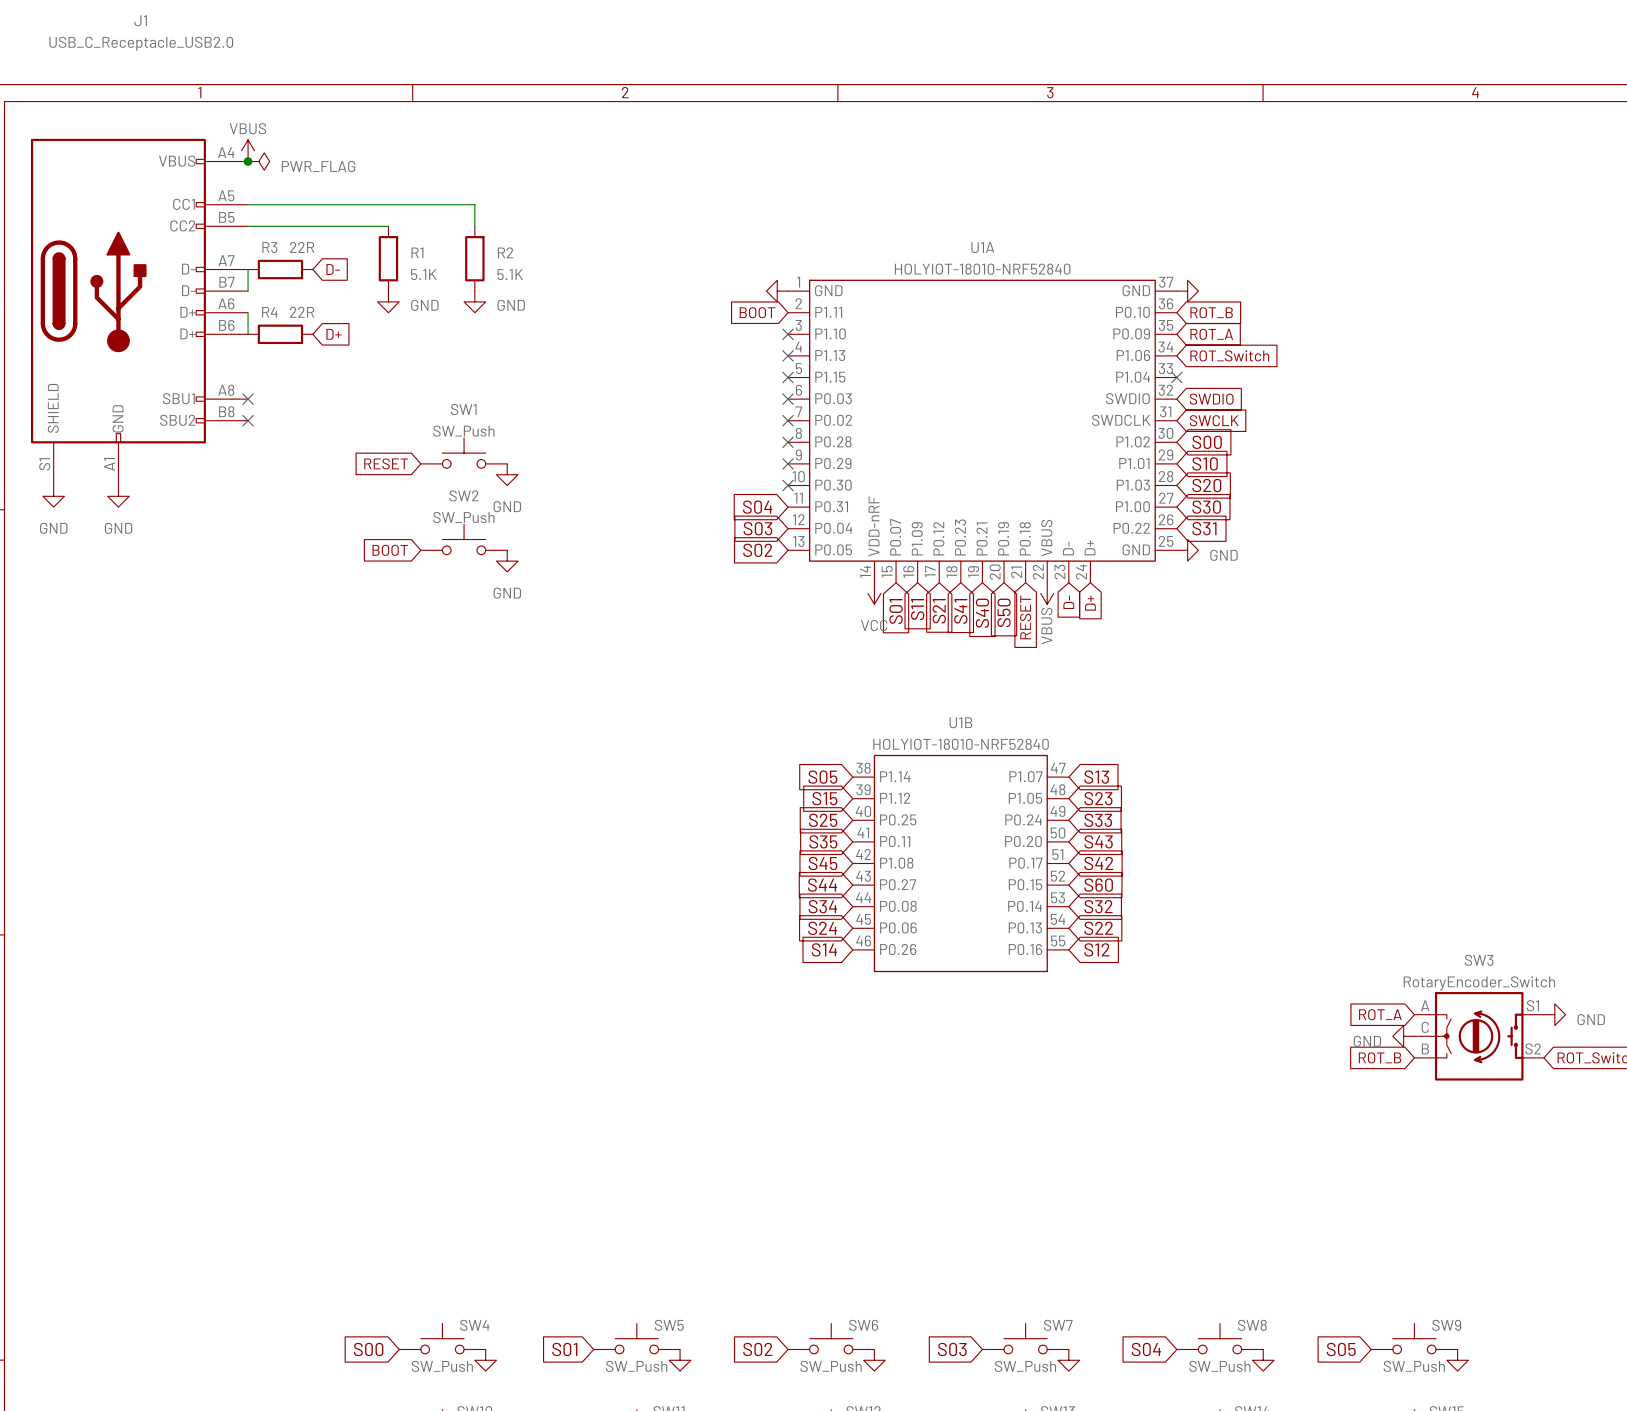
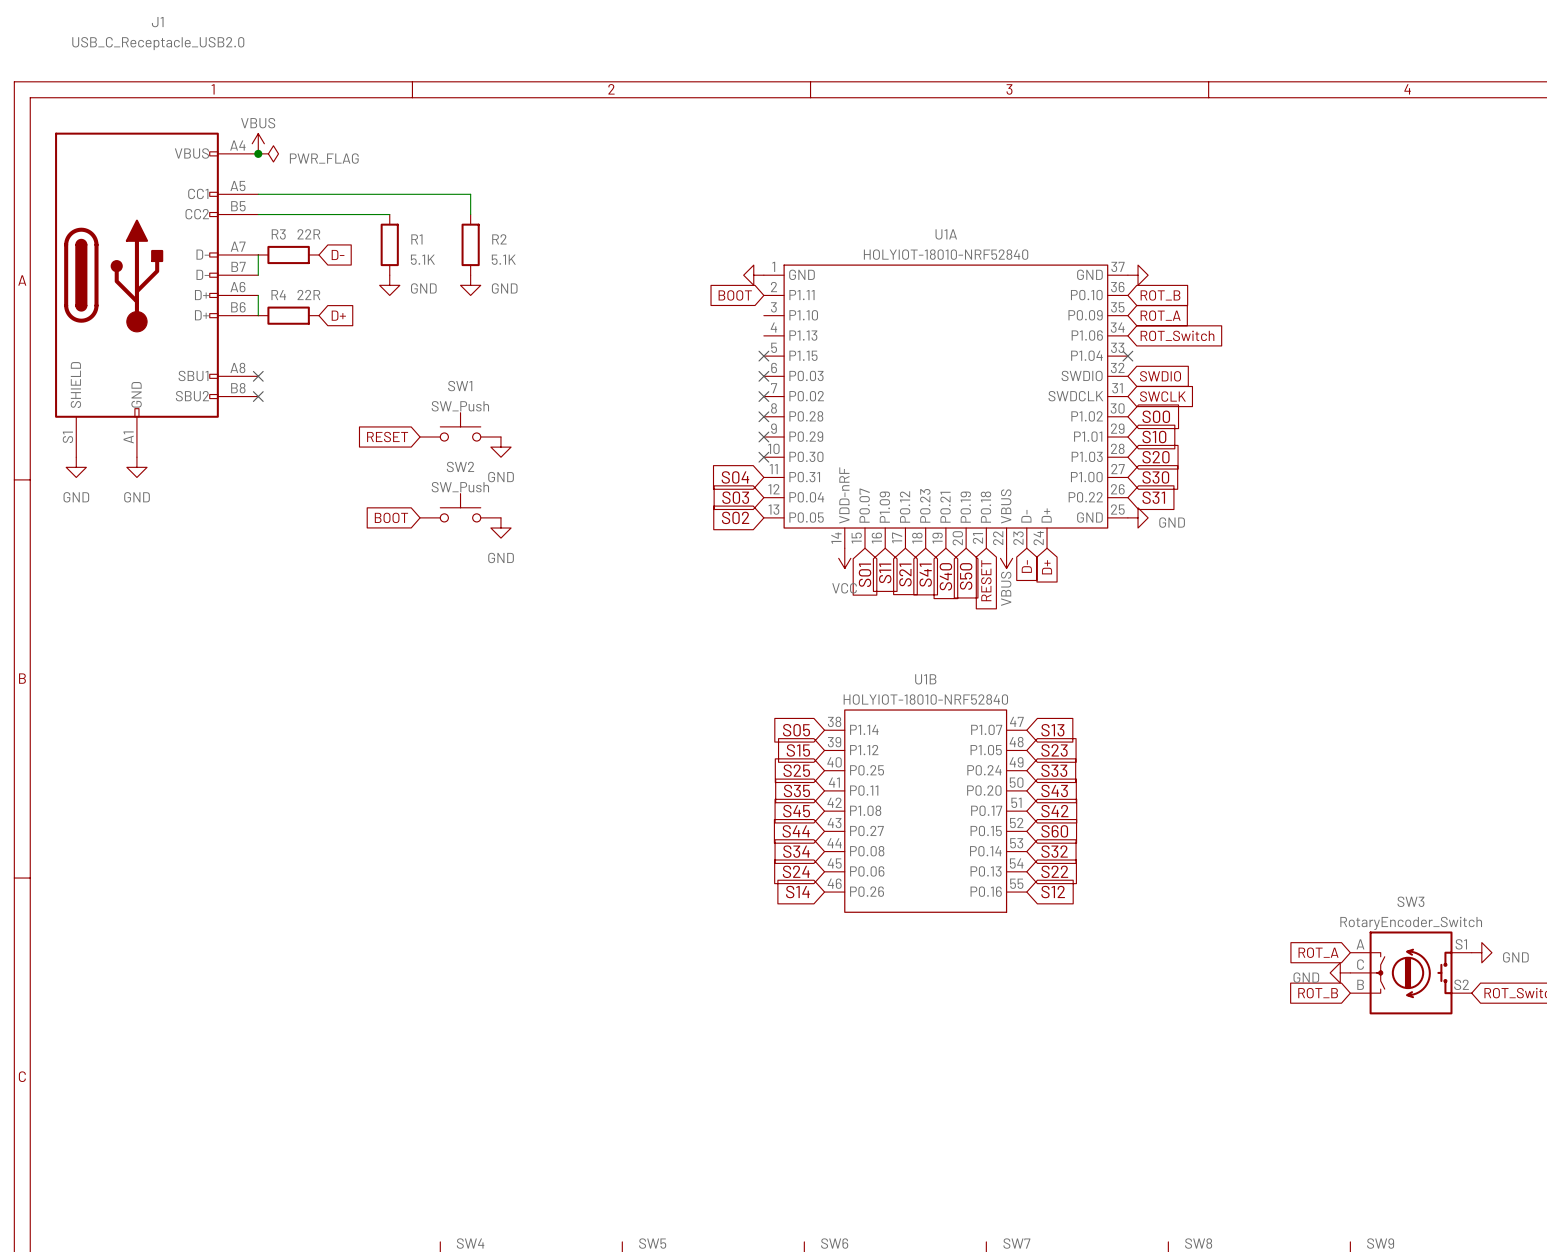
no-connect mark: (788, 334) -> none
no-connect mark: (788, 355) -> none

